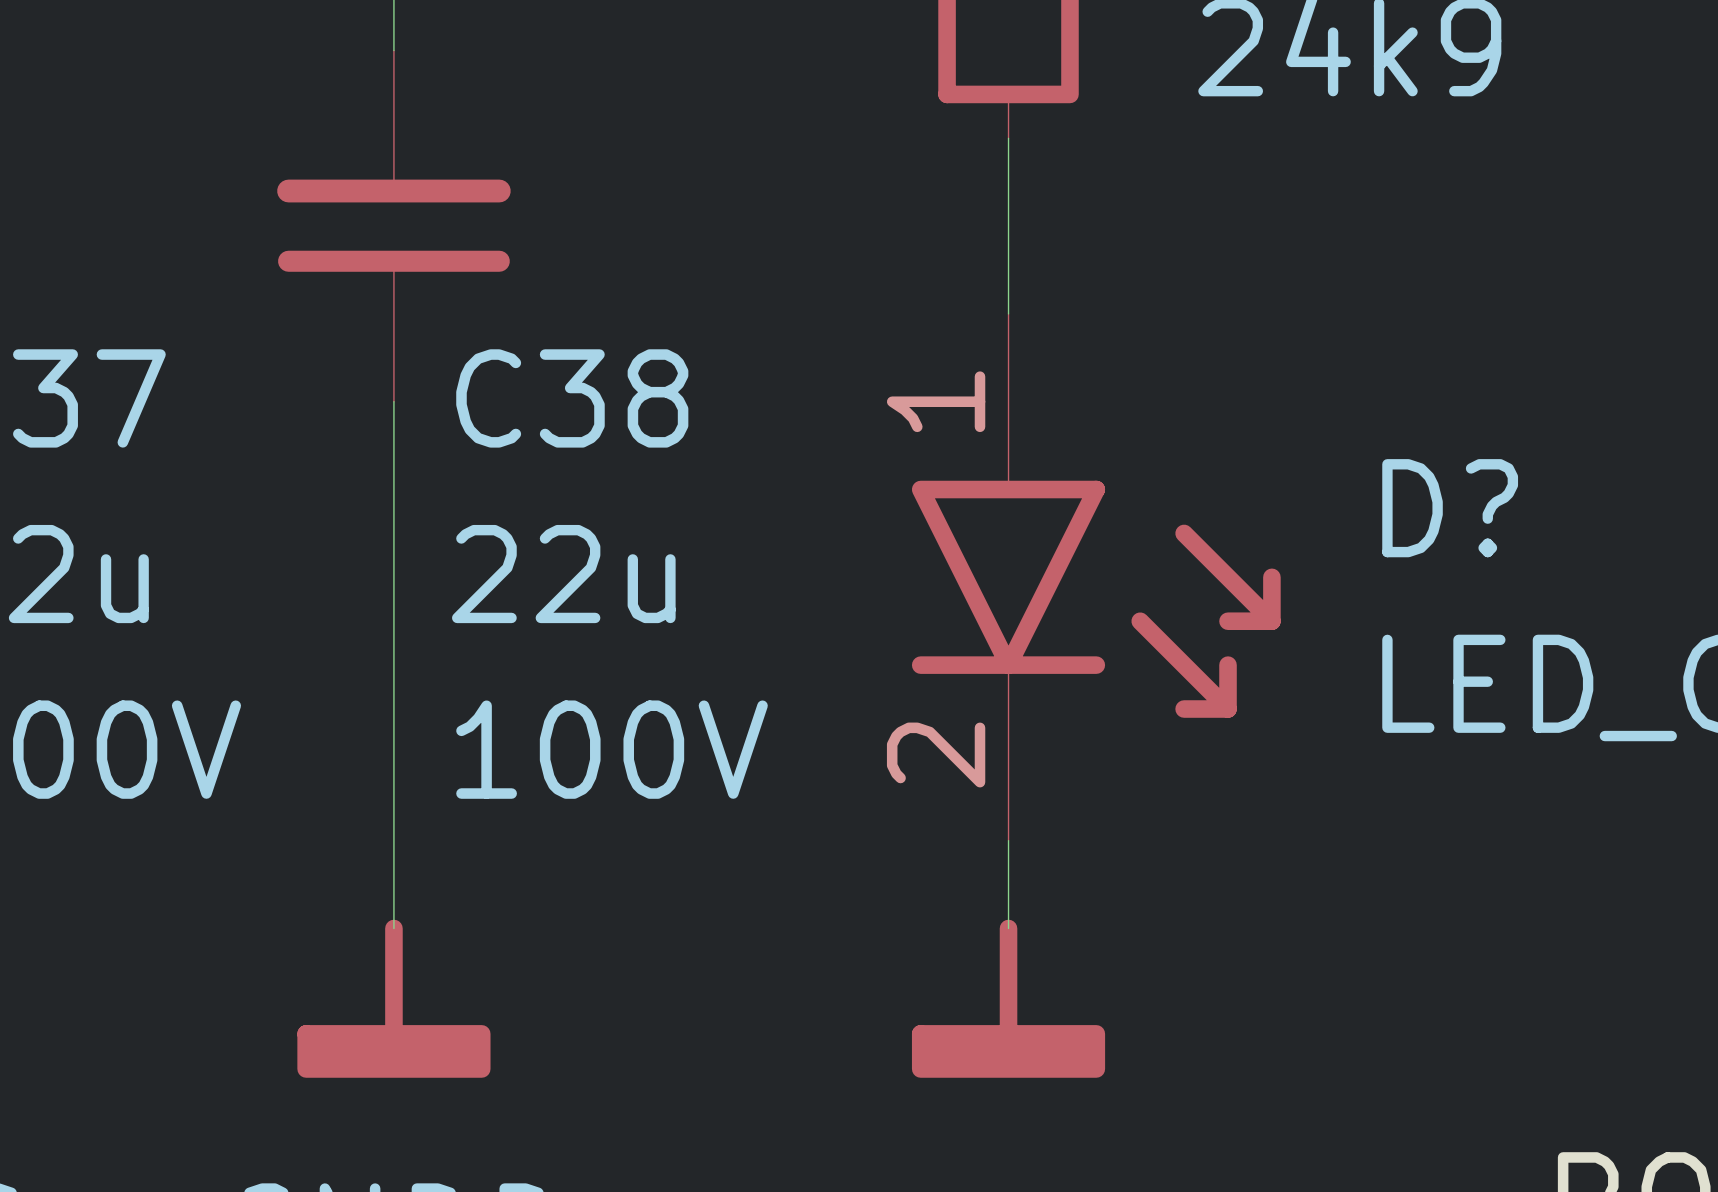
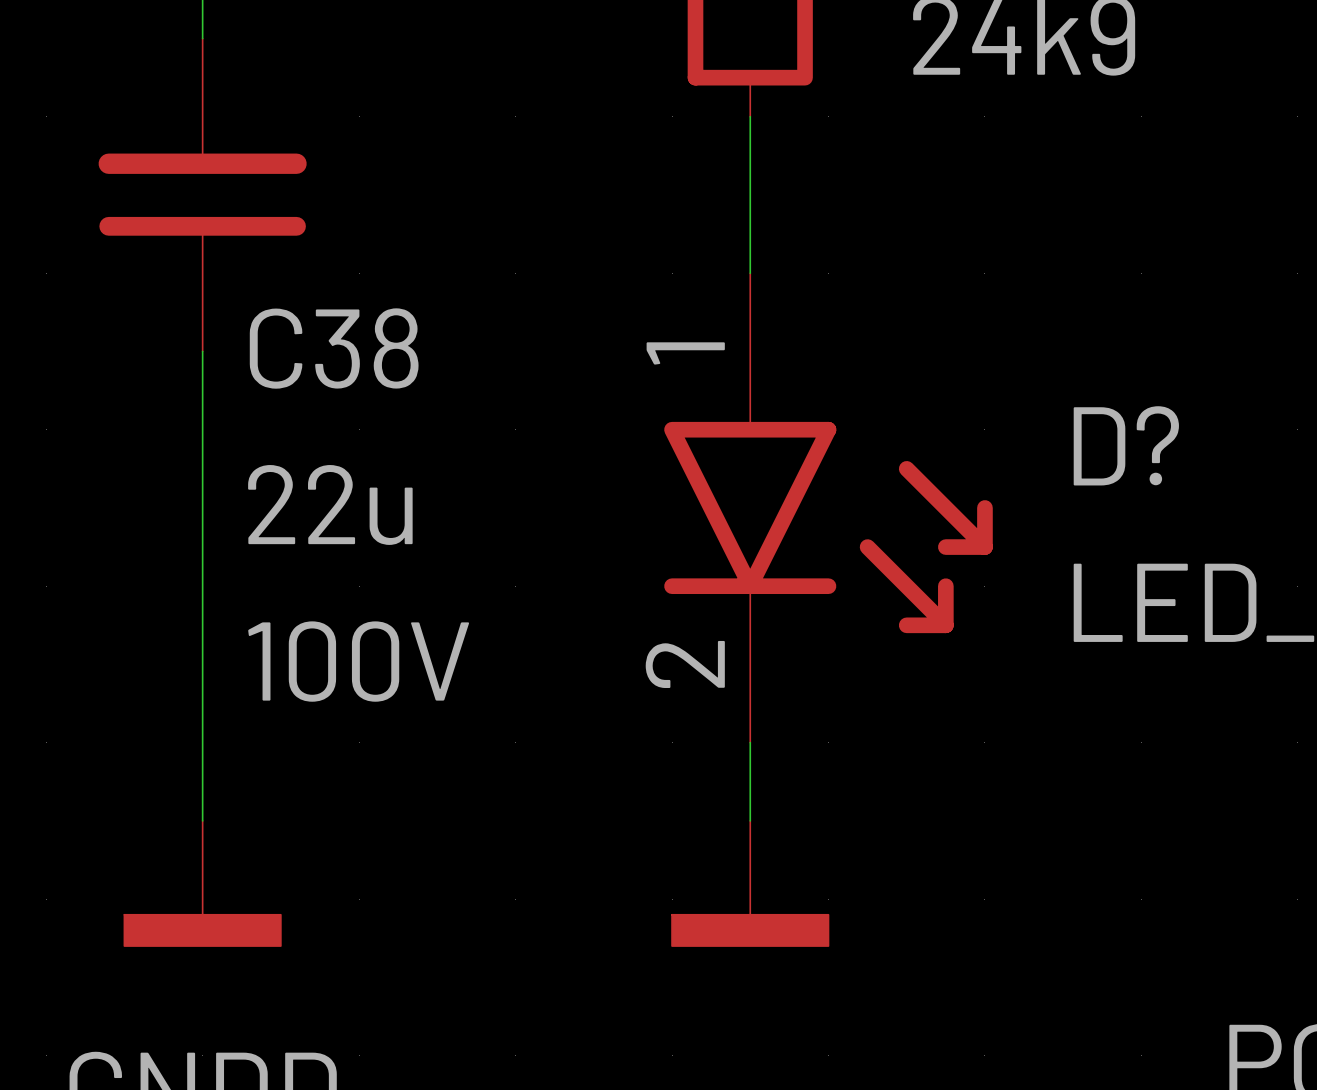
power symbol shape: [297, 919, 491, 1078] -> [124, 820, 281, 947]
power symbol shape: [911, 919, 1106, 1078] -> [672, 820, 829, 947]

